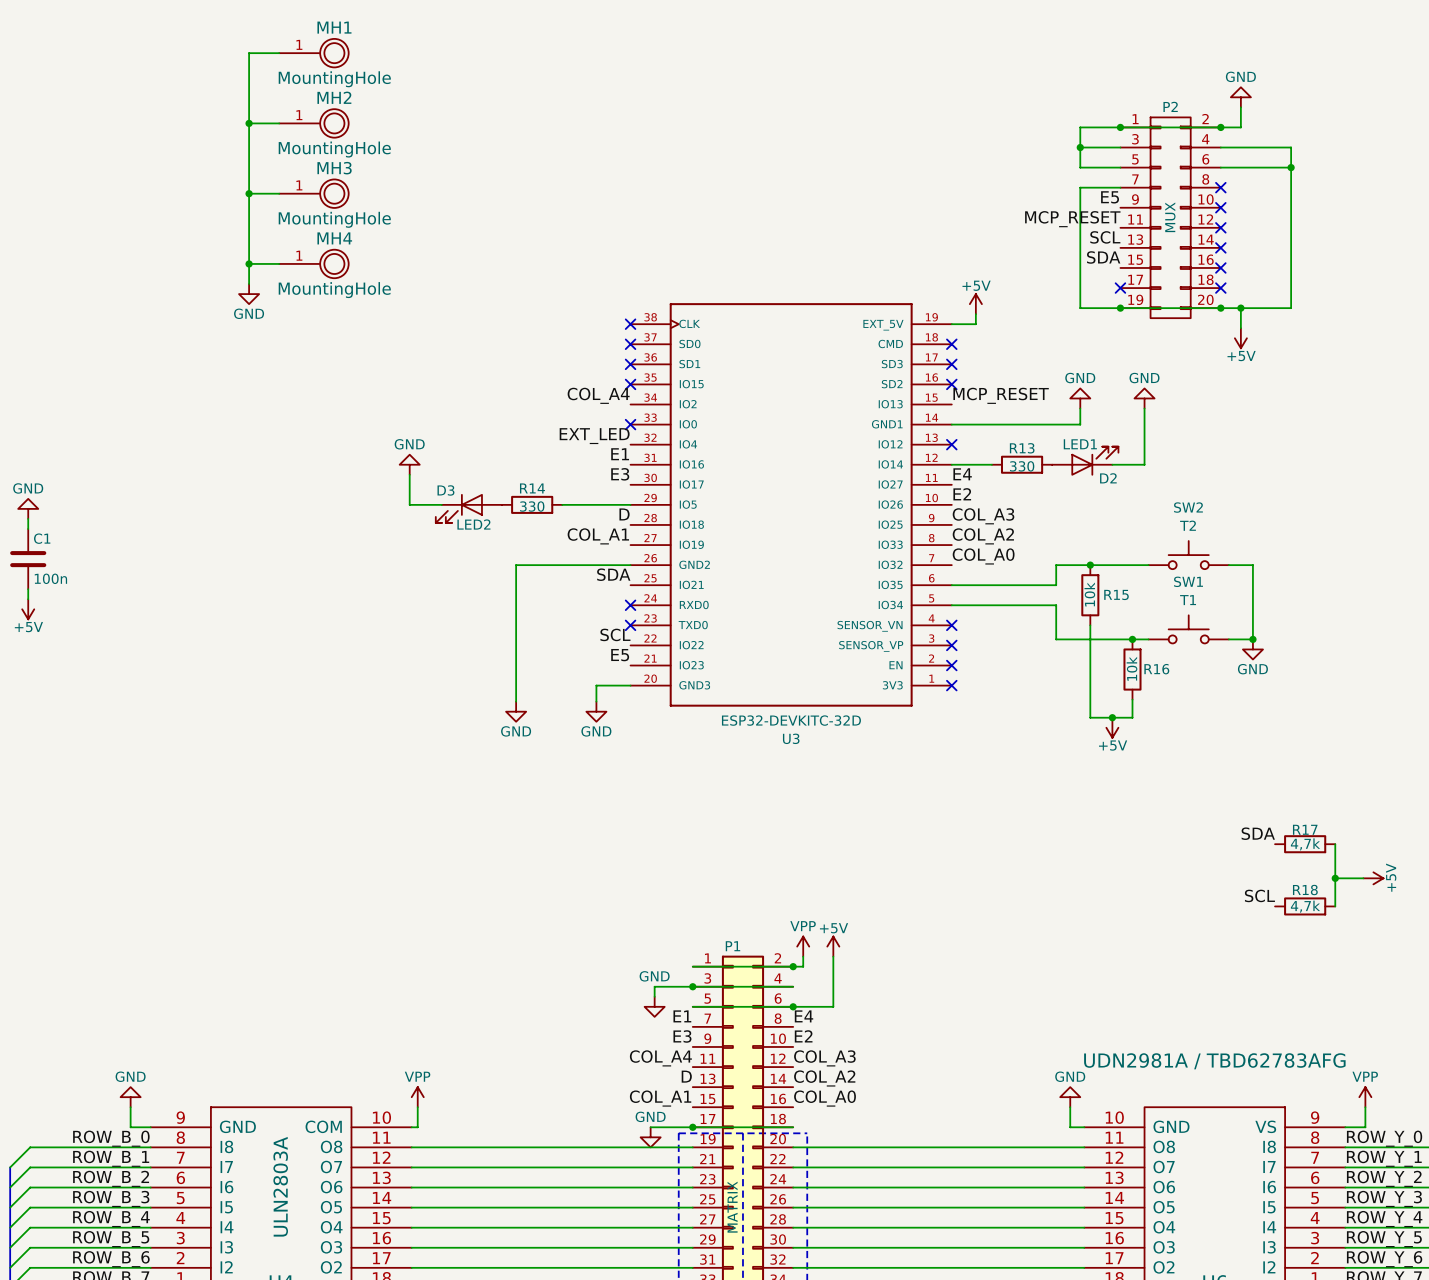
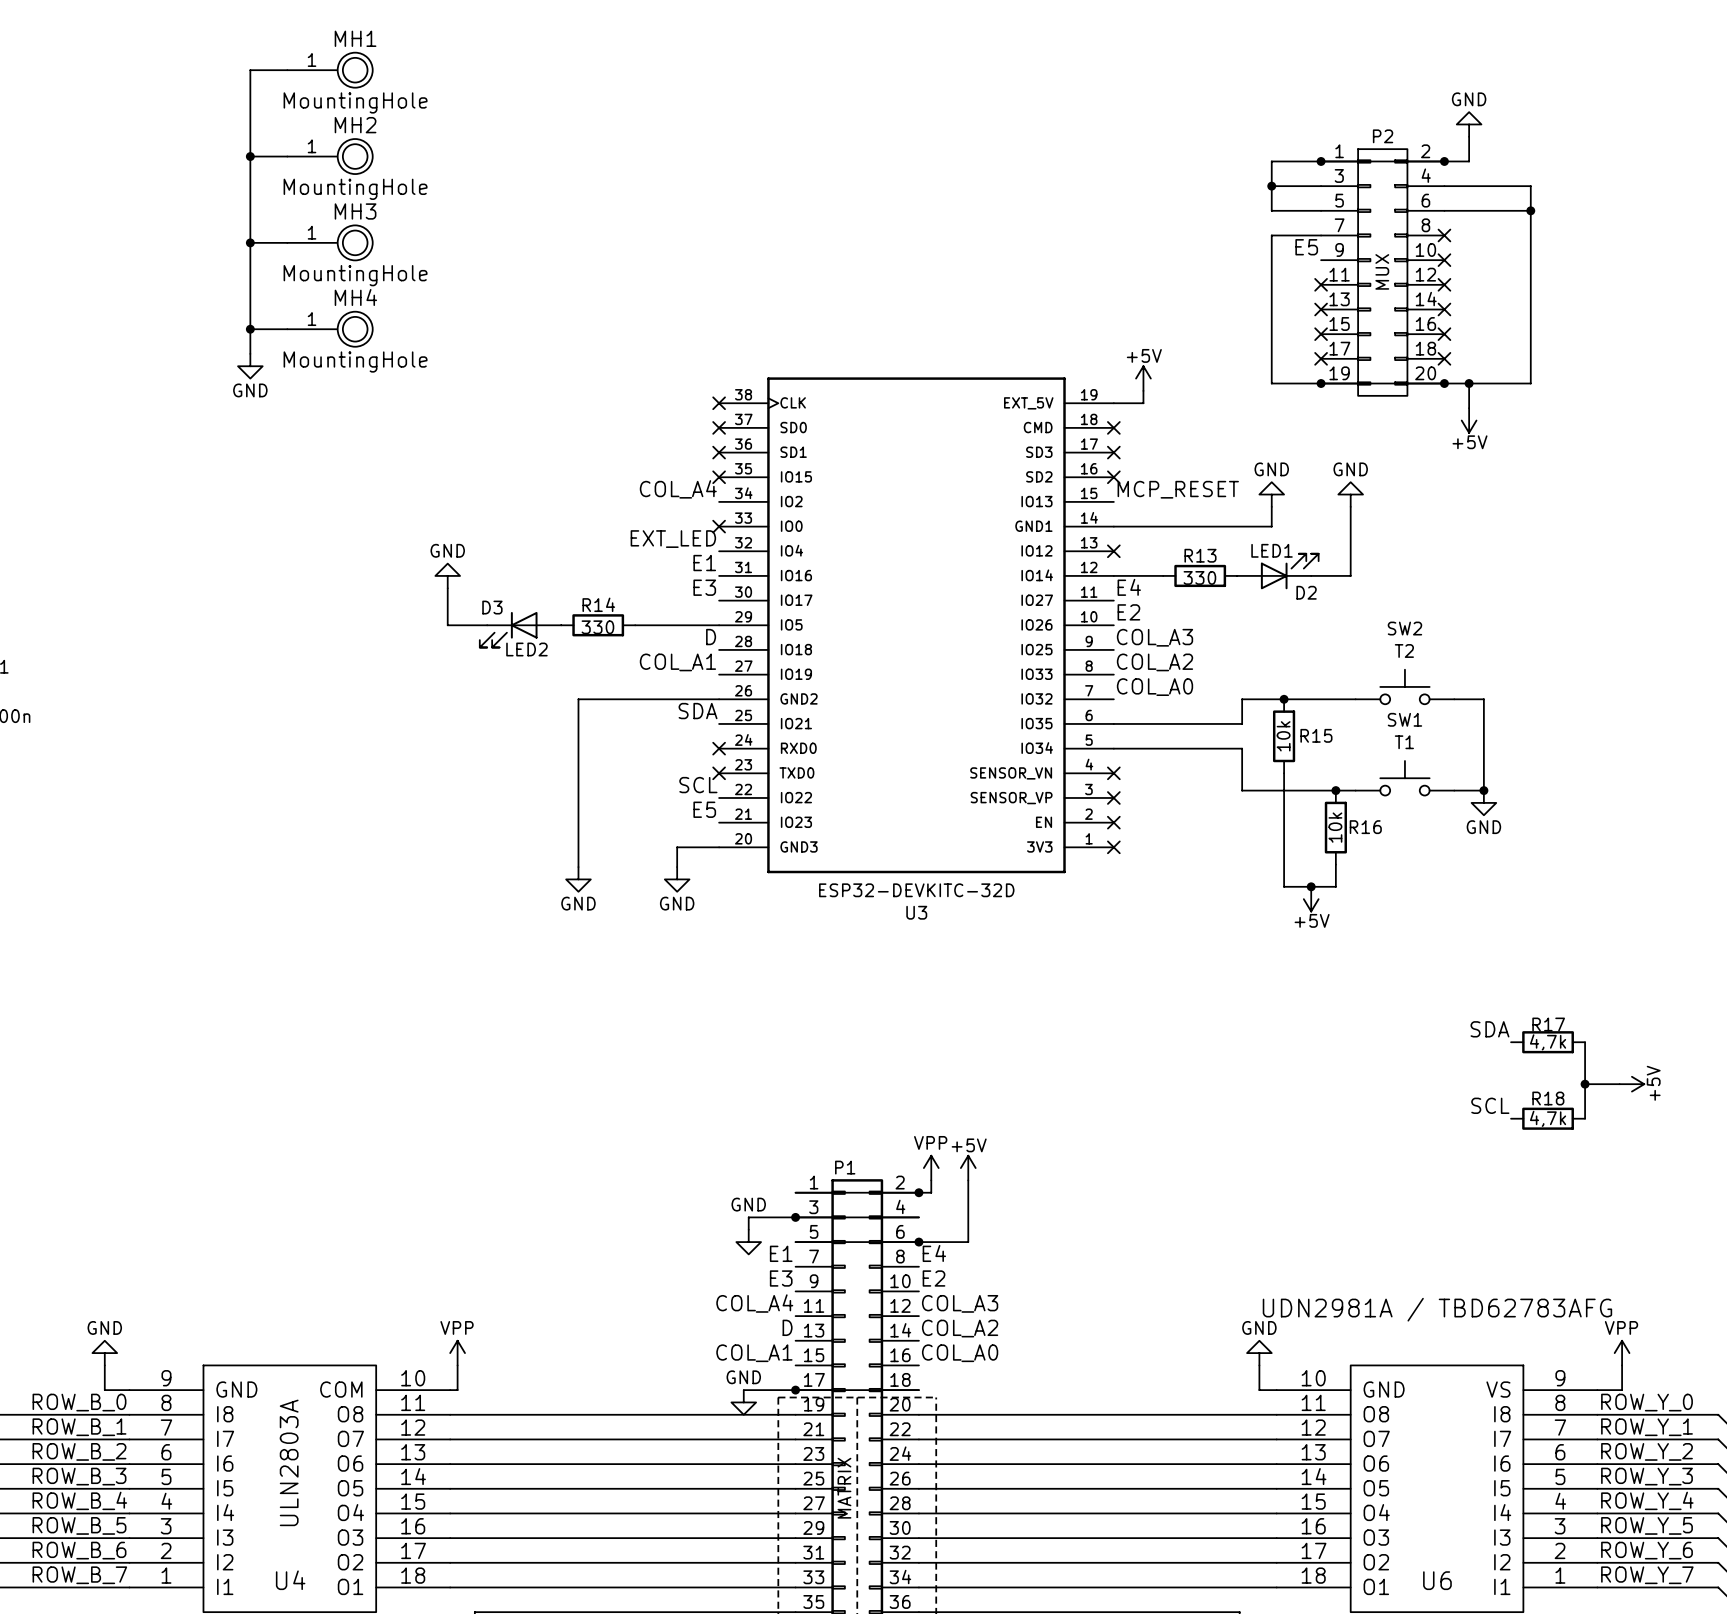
label: MCP_RESET (1072, 219) -> none
no-connect mark: none -> (1321, 284)
label: SCL (1105, 237) -> none
no-connect mark: none -> (1321, 309)
label: SDA (1103, 257) -> none
no-connect mark: none -> (1321, 334)

